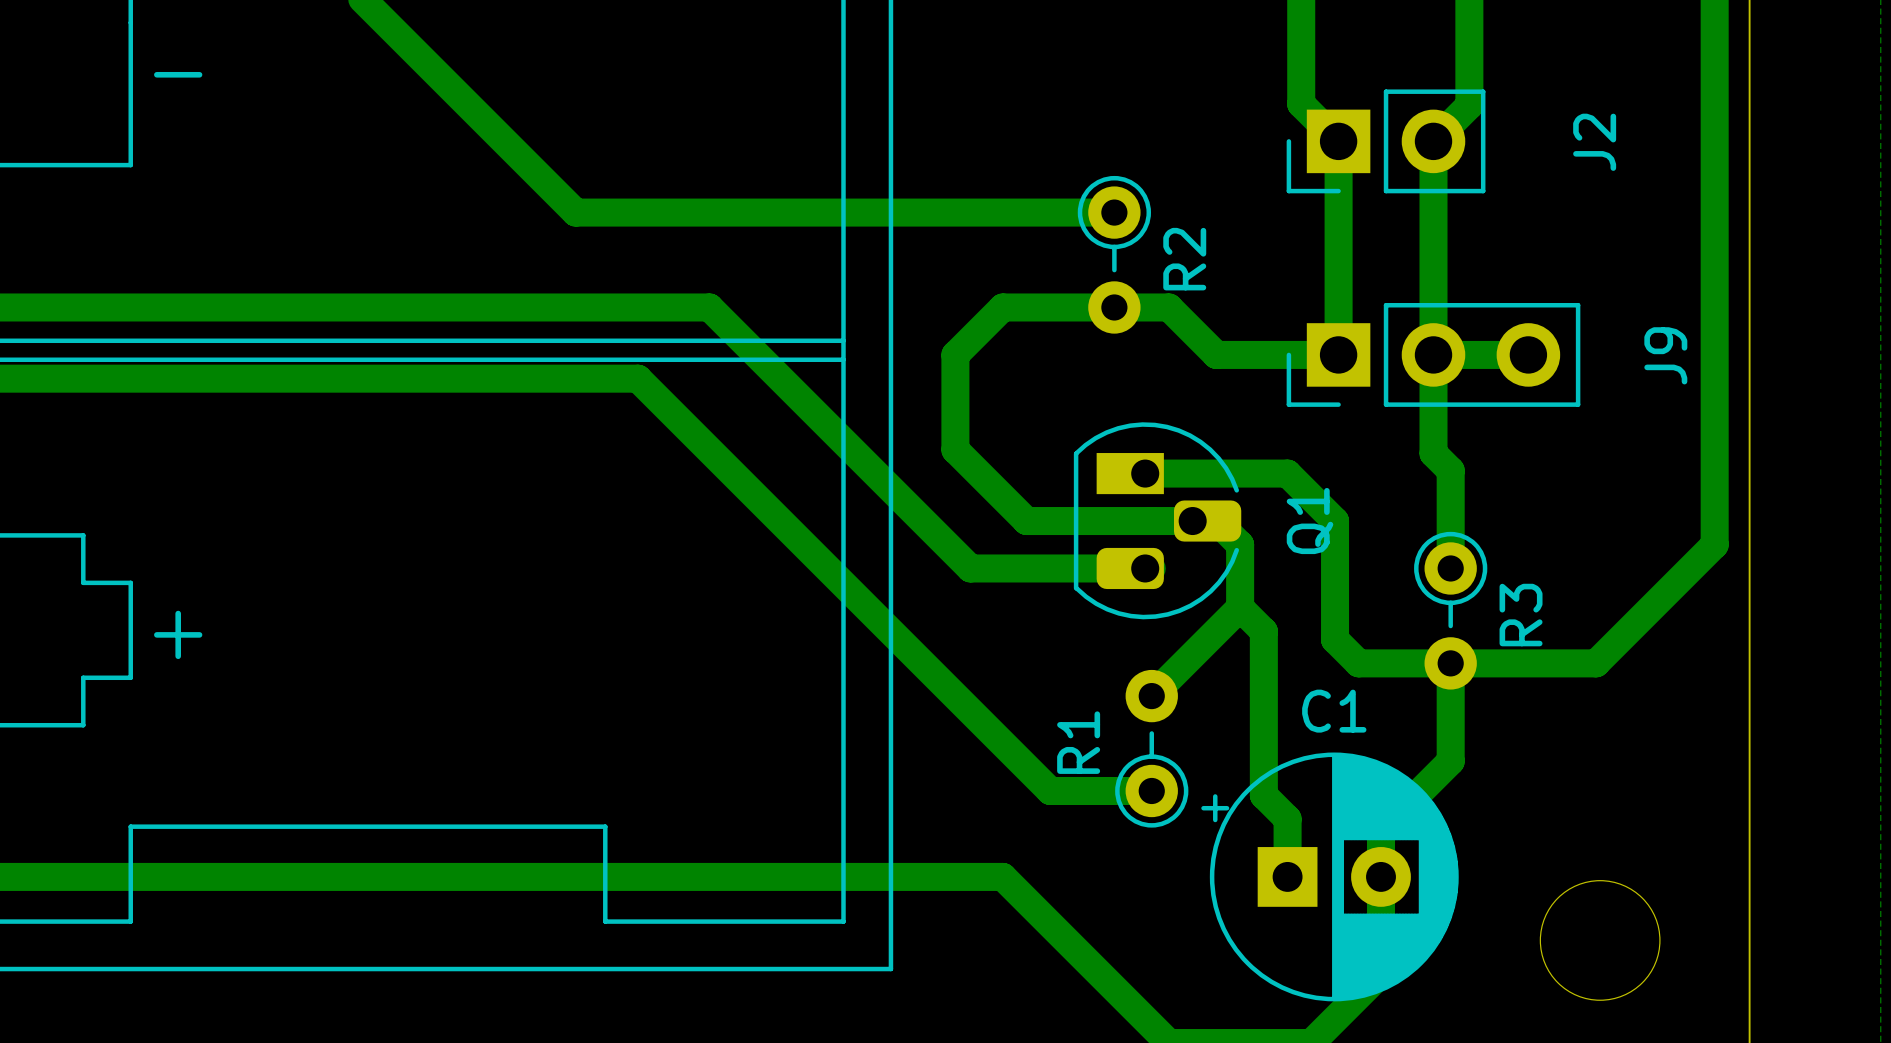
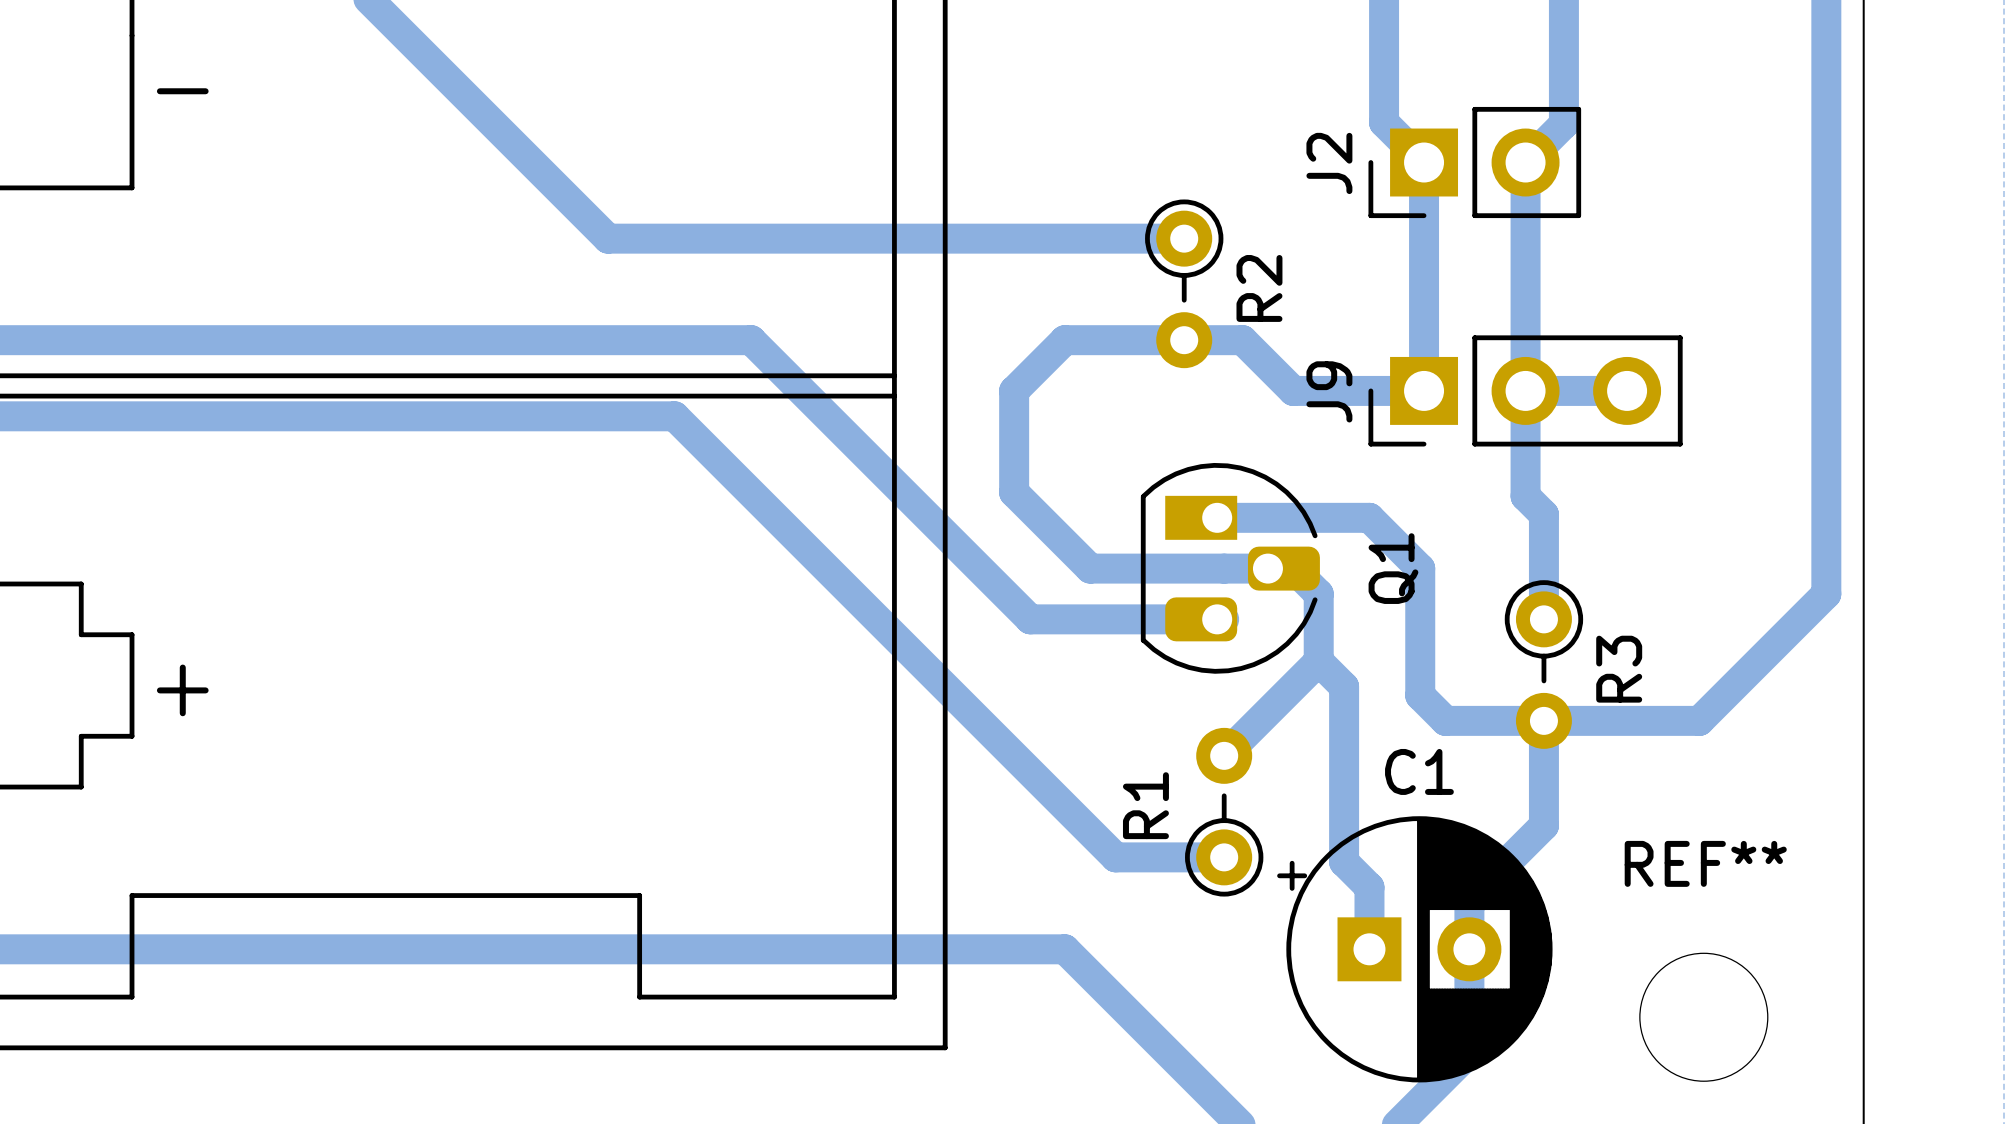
J2 name position: J2 (1594, 142) -> J2 (1329, 163)
J9 name position: J9 (1665, 355) -> J9 (1329, 391)
REF** name: none -> REF** (1705, 863)

